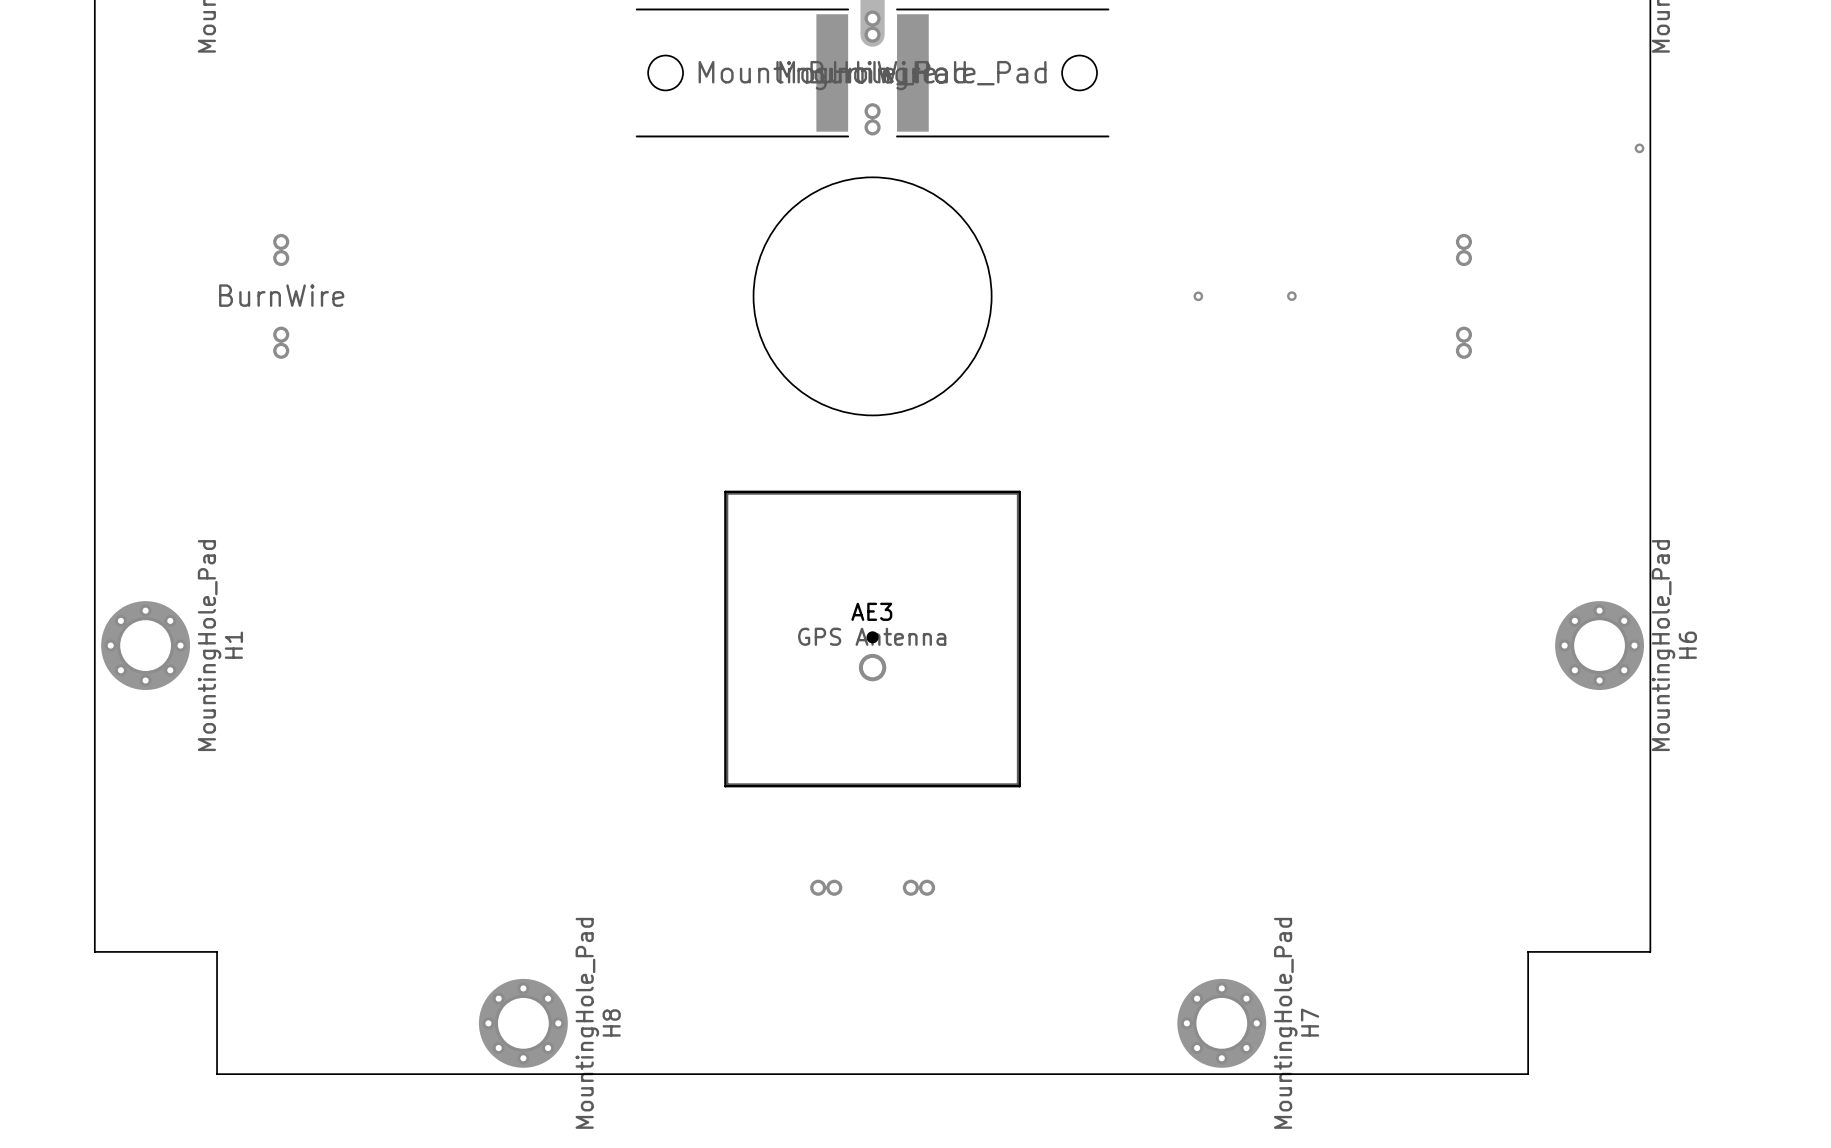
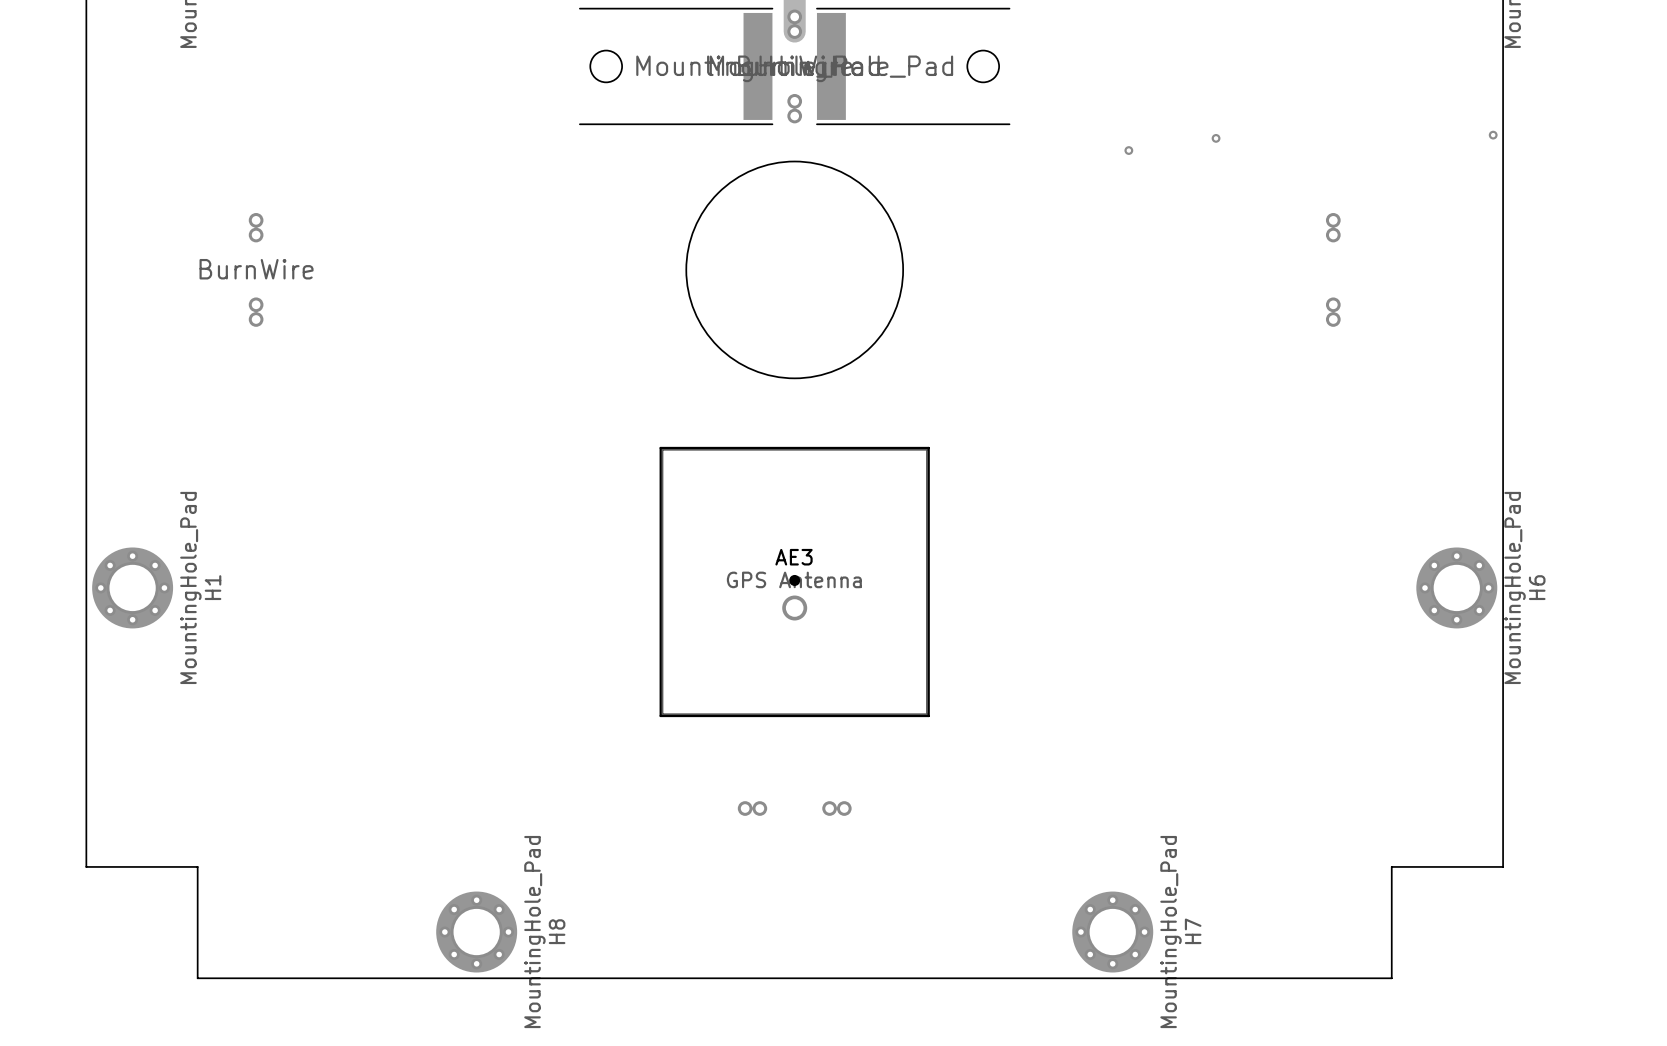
via: none -> (1216, 138)
via: none -> (1128, 150)
via: (1198, 296) -> none
via: (1291, 296) -> none

